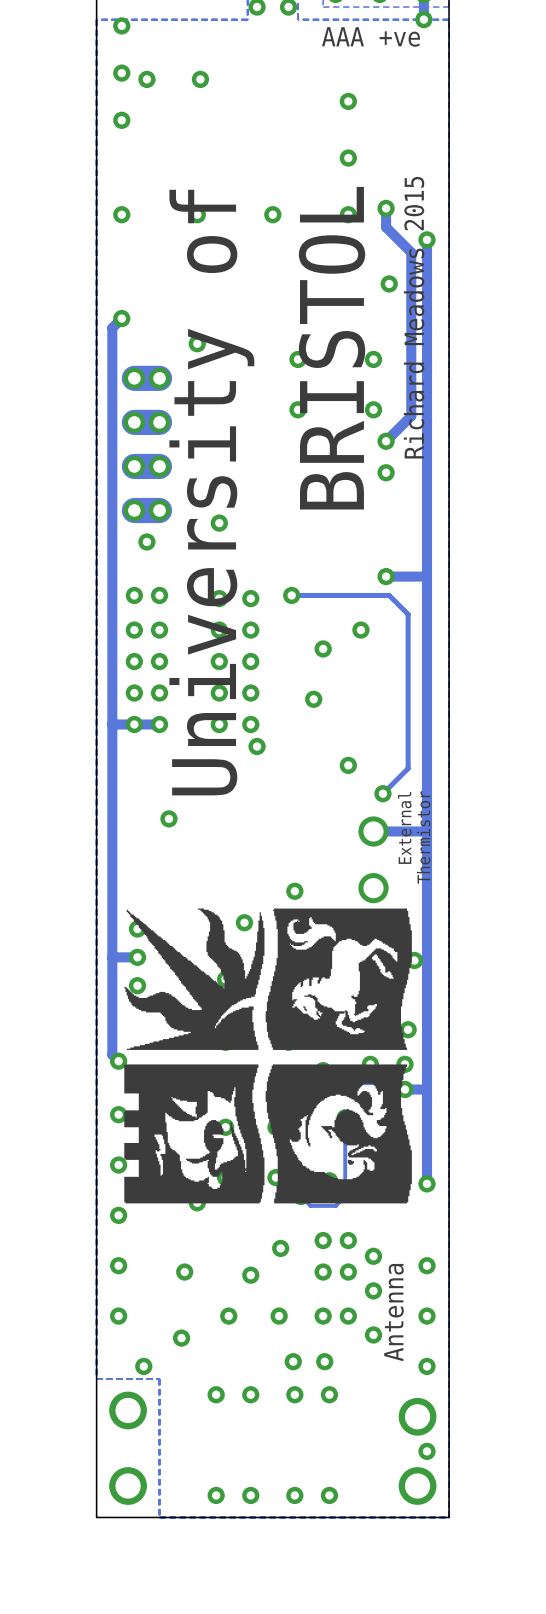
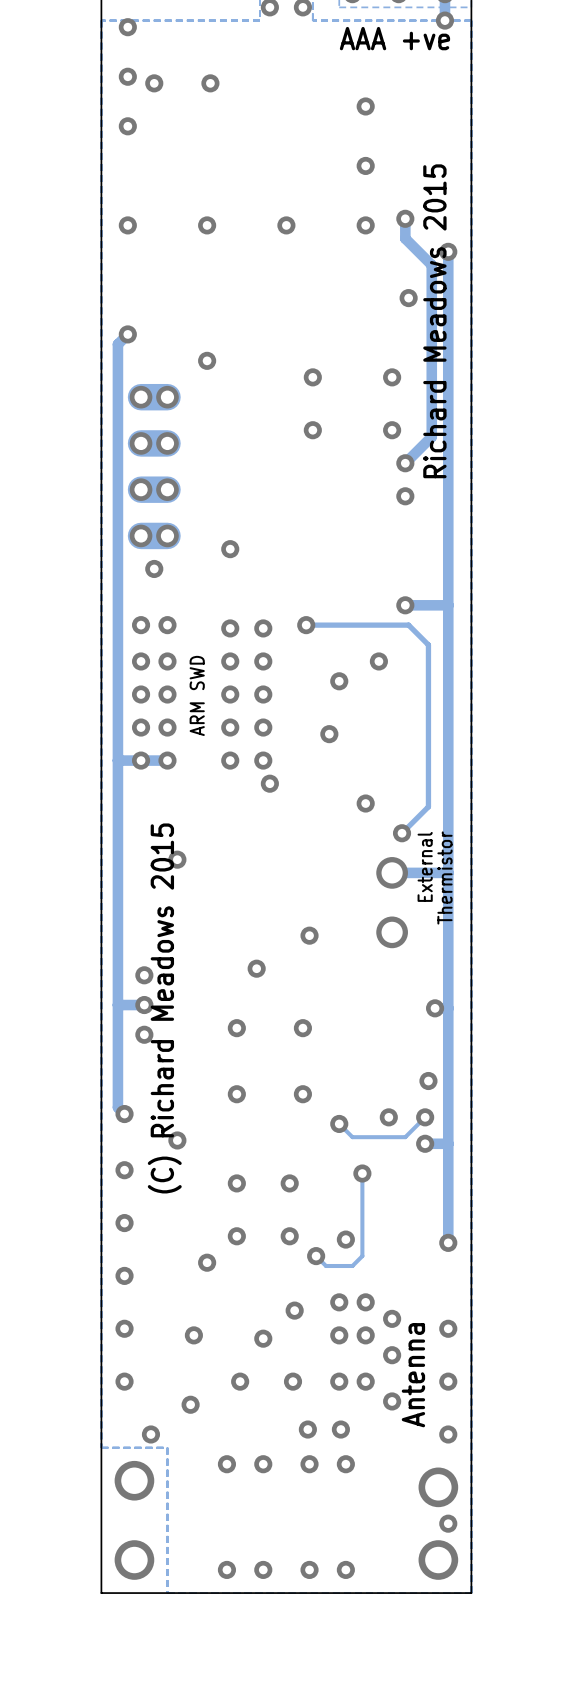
text: BRISTOL (332, 348) -> none
text: University of (211, 492) -> none
text: none -> ARM SWD (197, 695)
drawing: [124, 908, 412, 1204] -> none
text: none -> (C) Richard Meadows 2015 (164, 1008)

